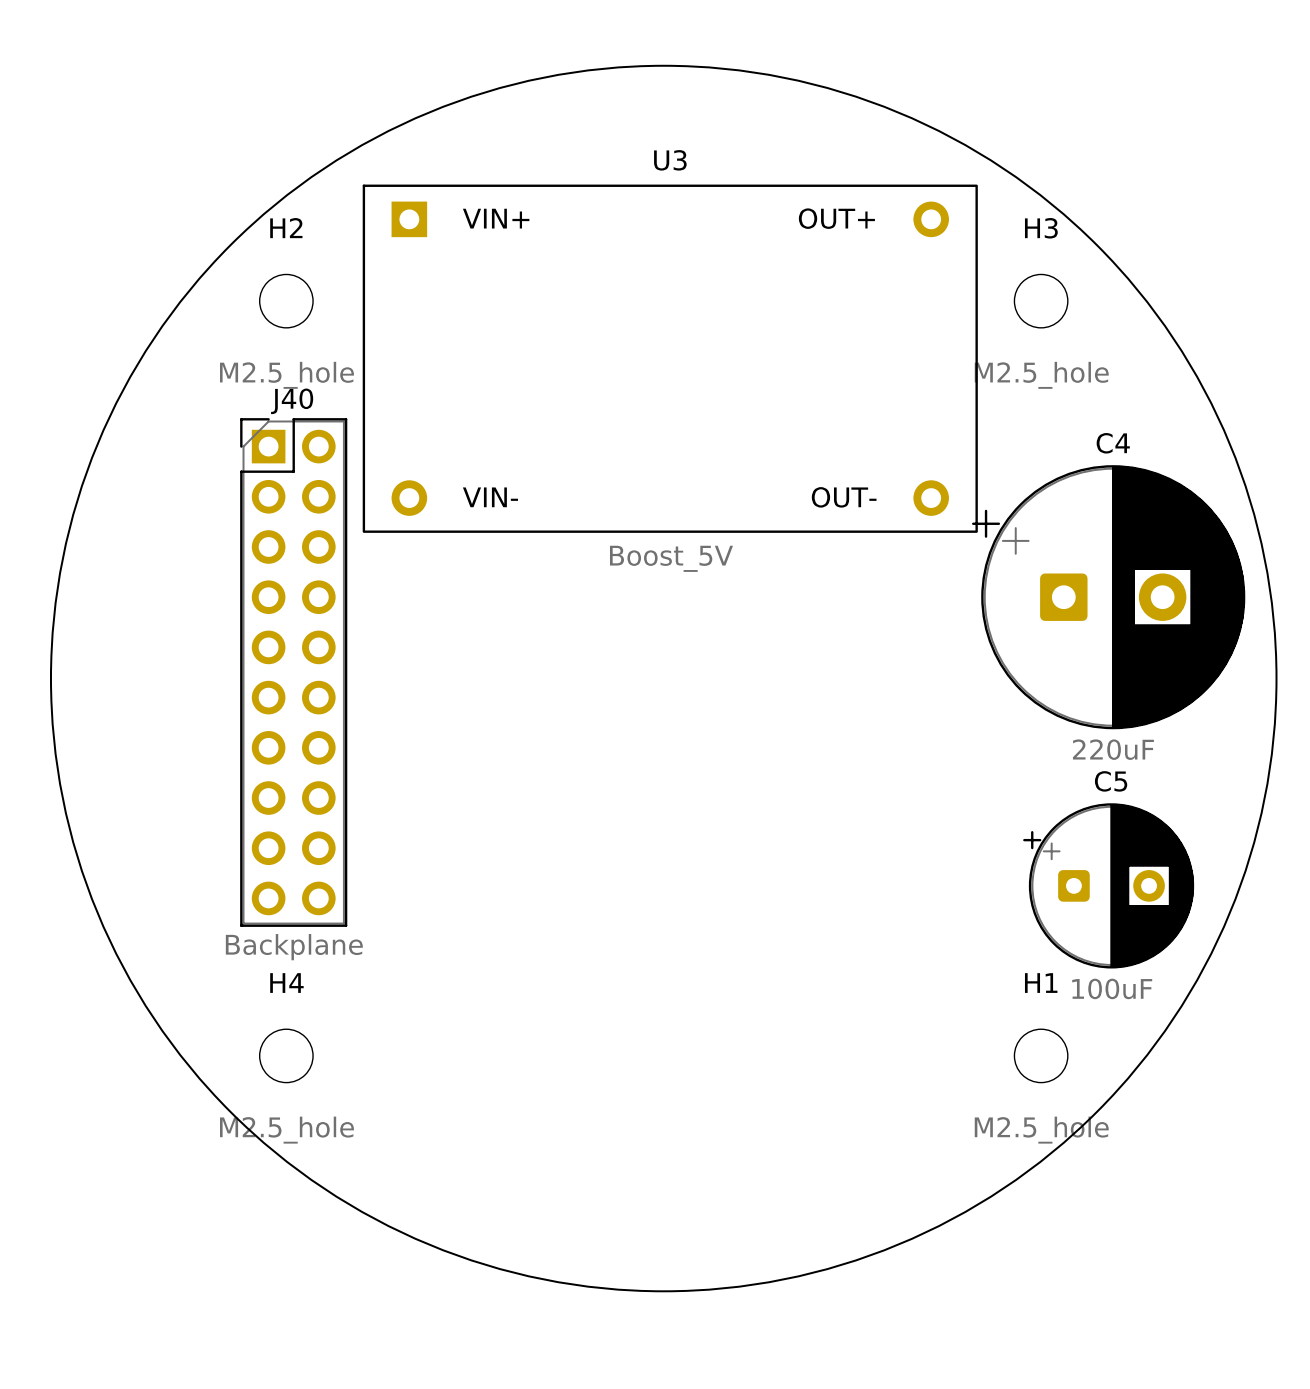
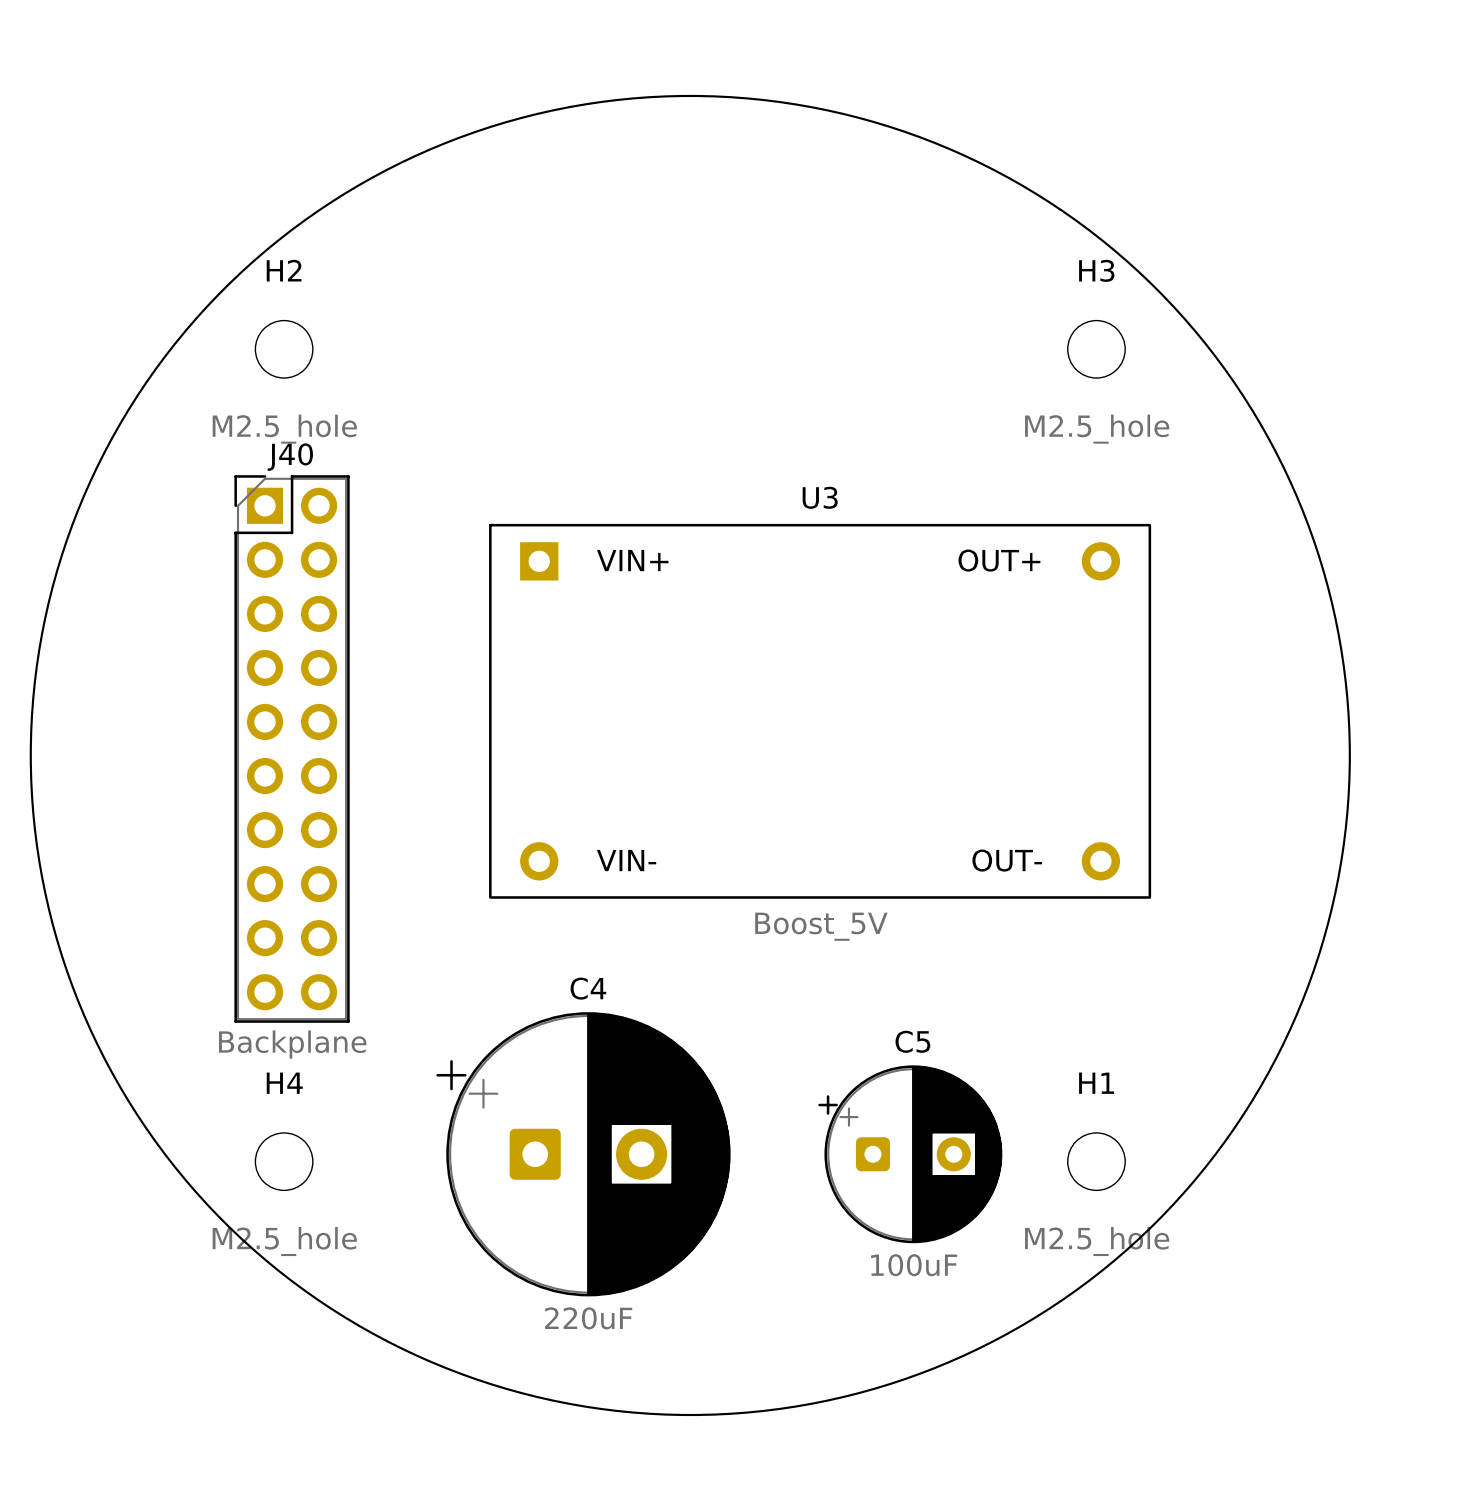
U3 position: (670, 358) -> (820, 711)
C4 position: (1108, 597) -> (583, 1154)
C5 position: (1108, 885) -> (910, 1154)

